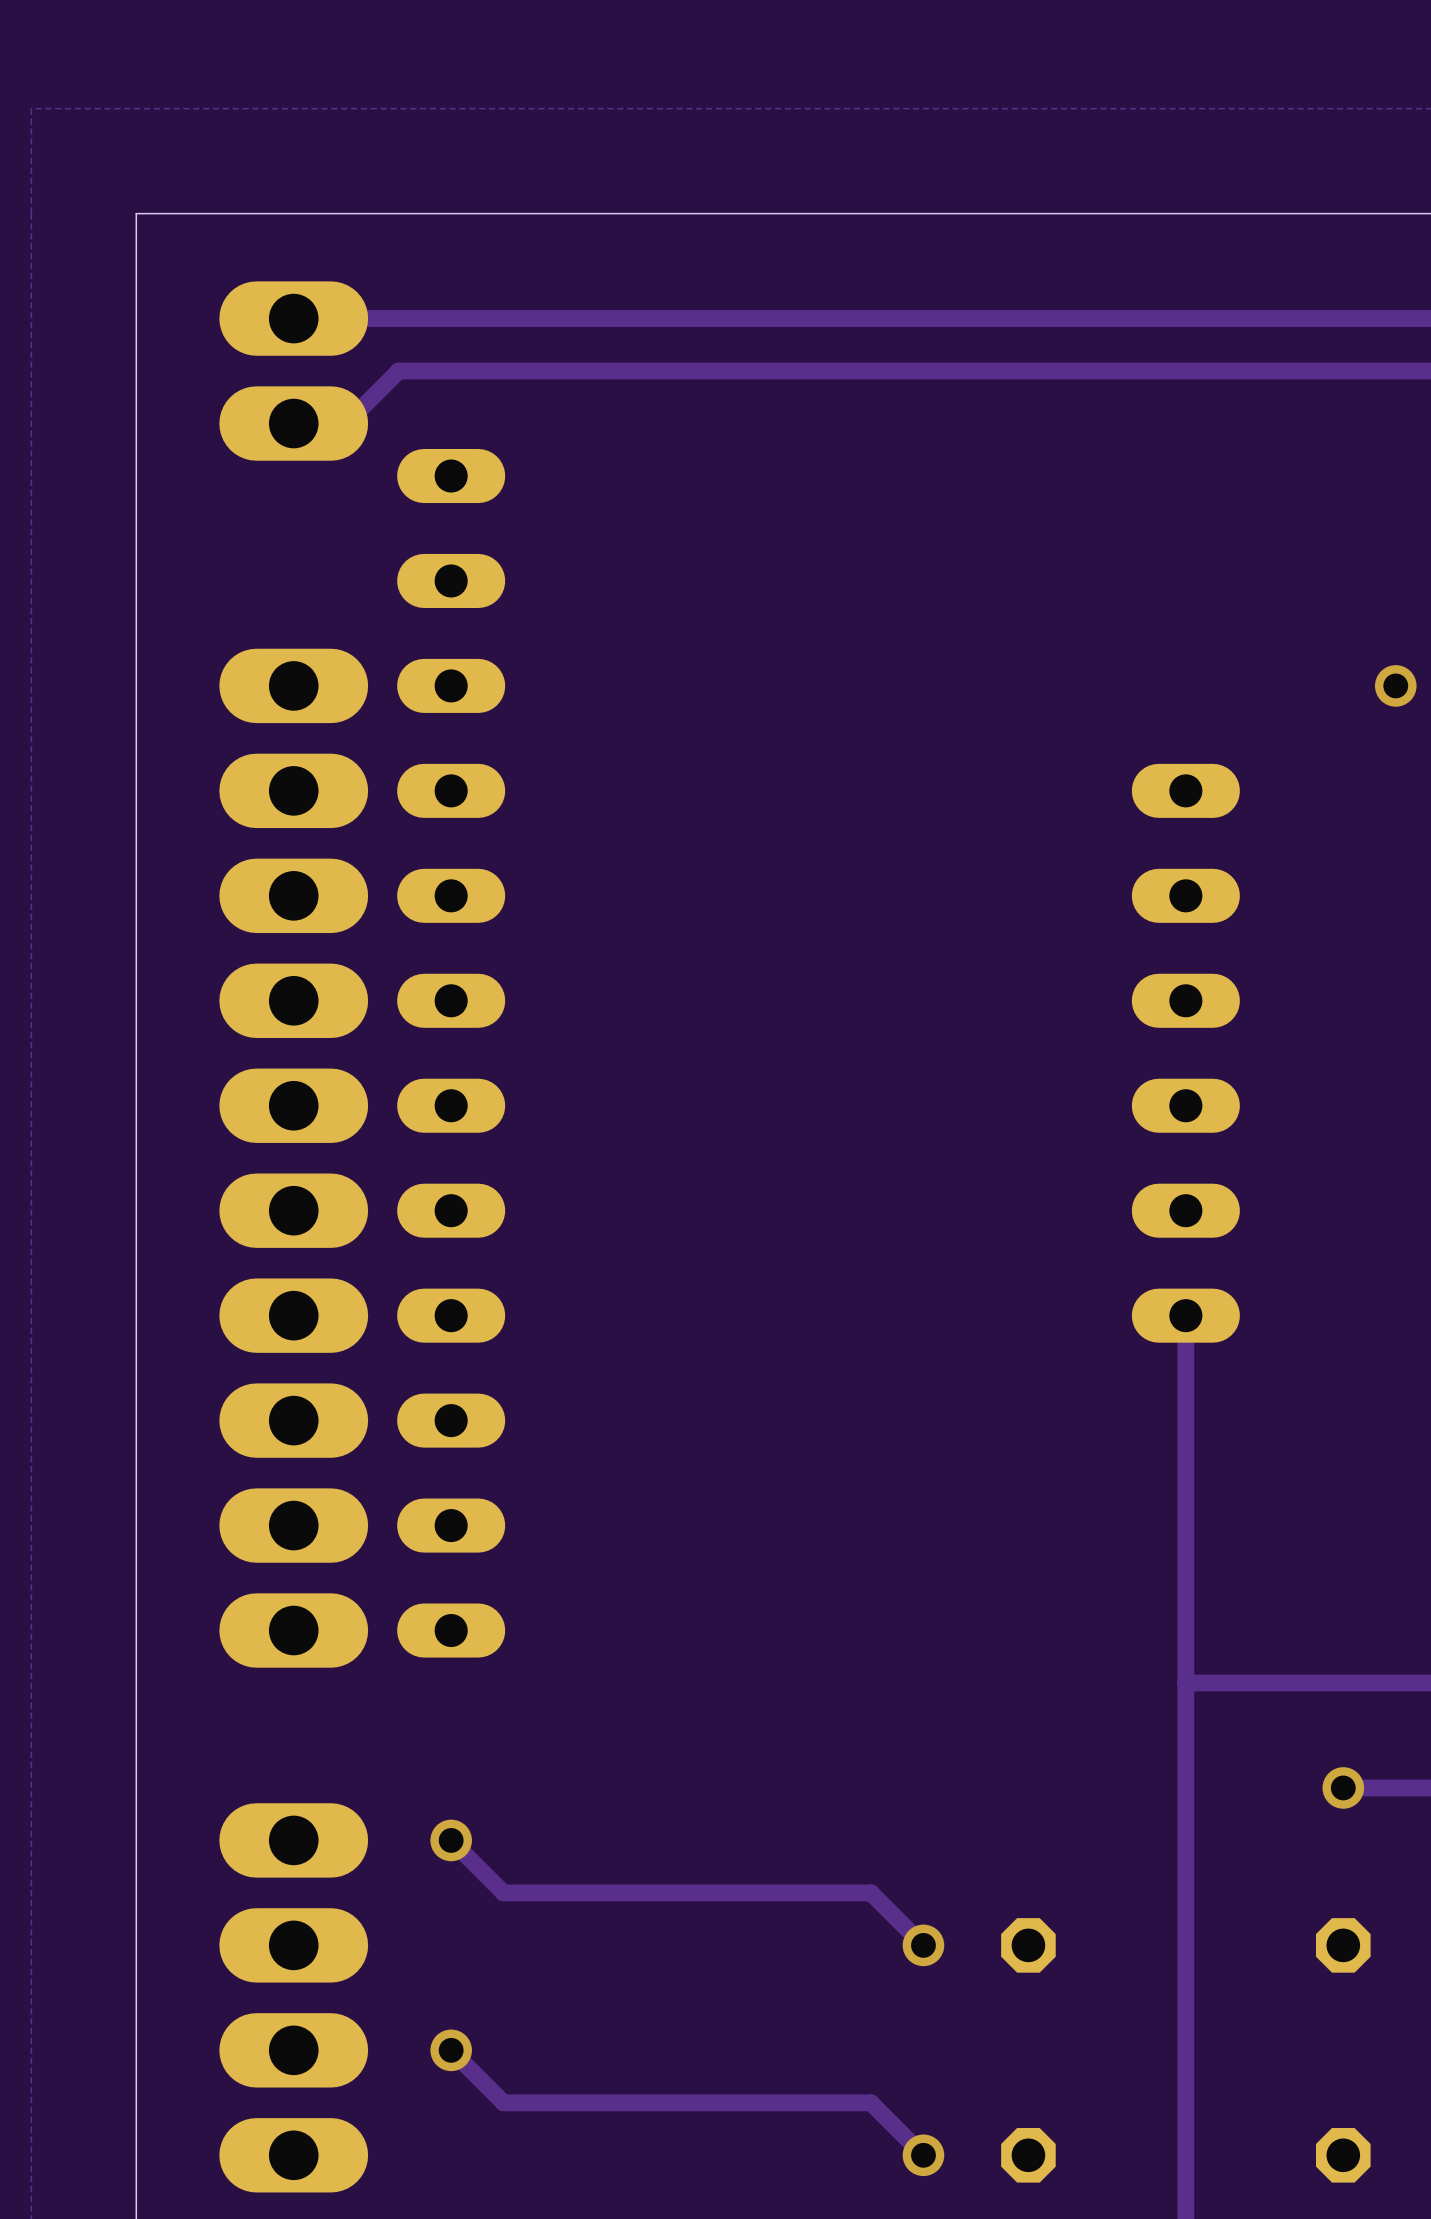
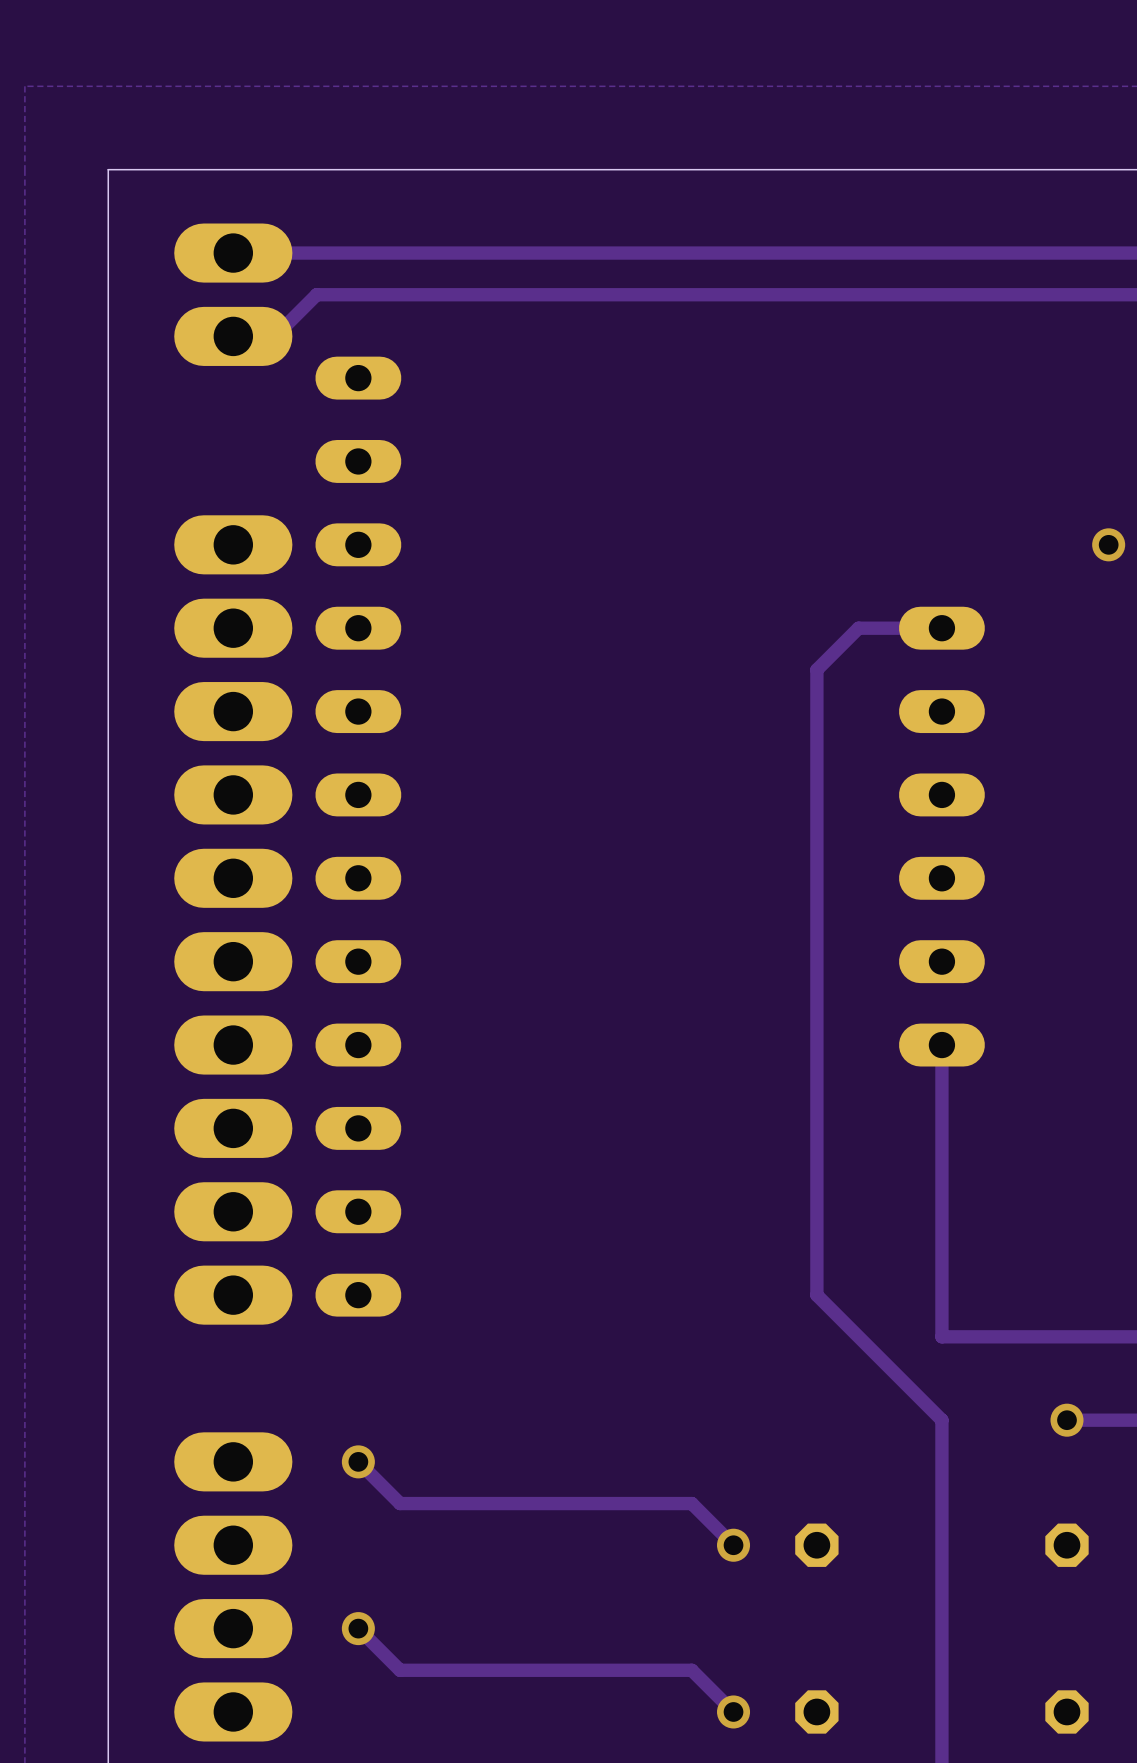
track: (1185, 1683) (1185, 1787) -> (941, 628) (858, 628) (816, 669) (816, 1295) (941, 1420)

